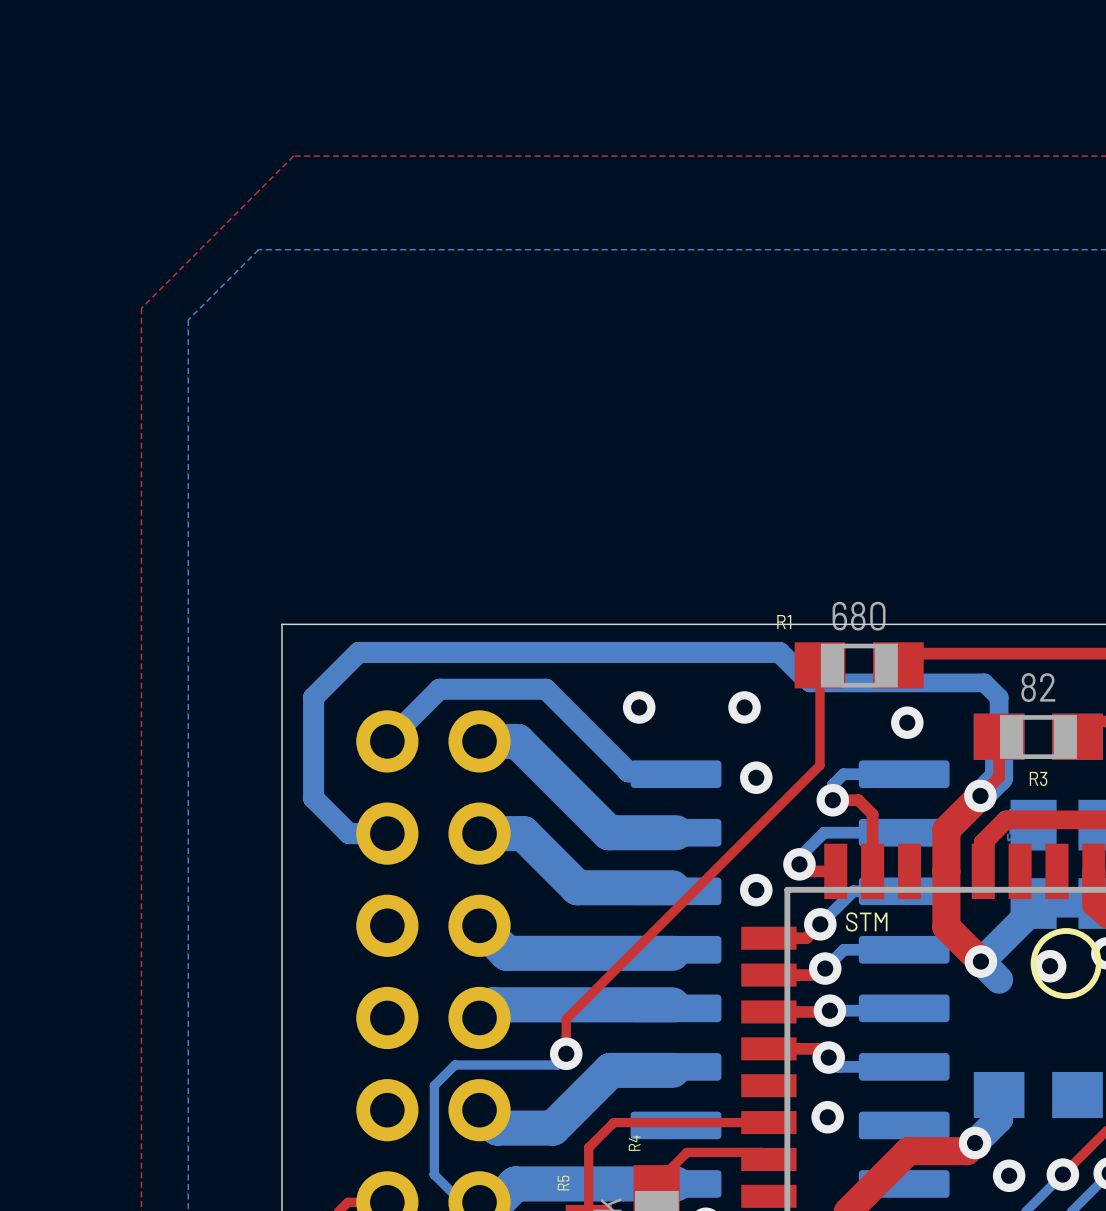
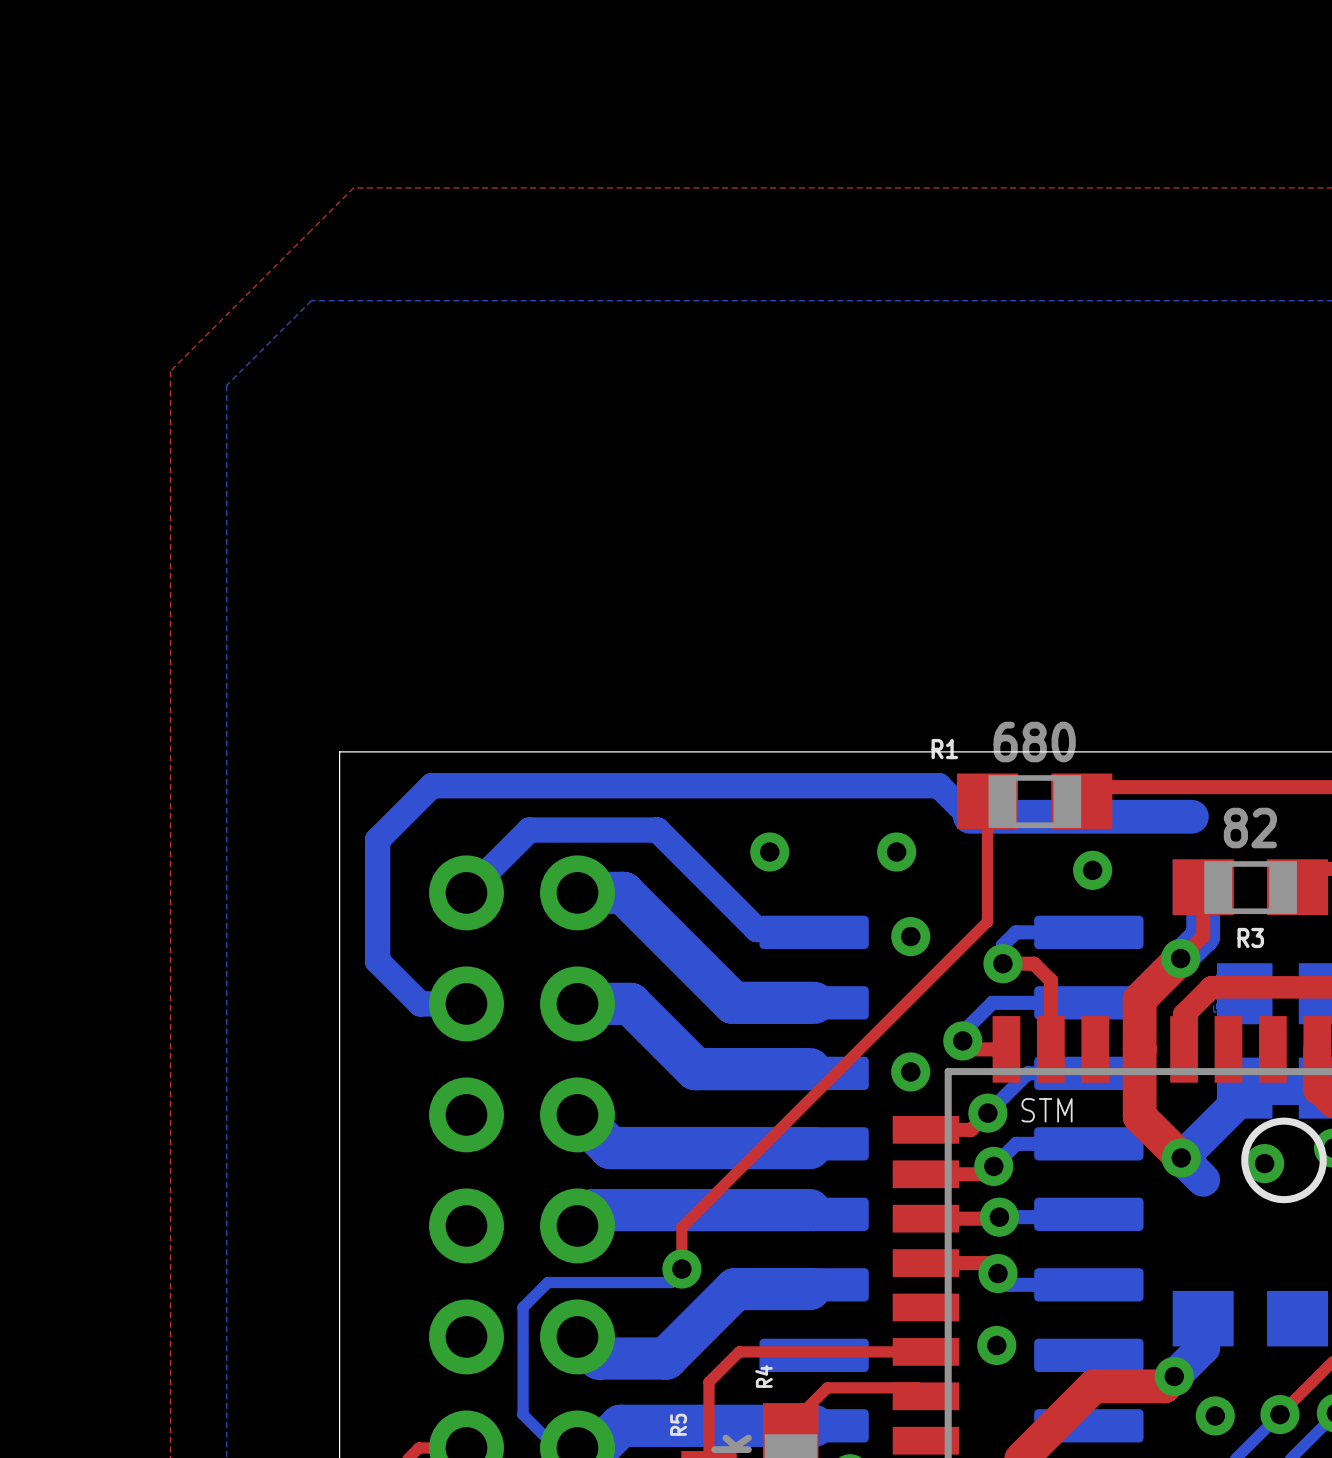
bottom track: (805, 678) (809, 682) (984, 682) (999, 697) (999, 736) -> (969, 816) (1191, 816)

